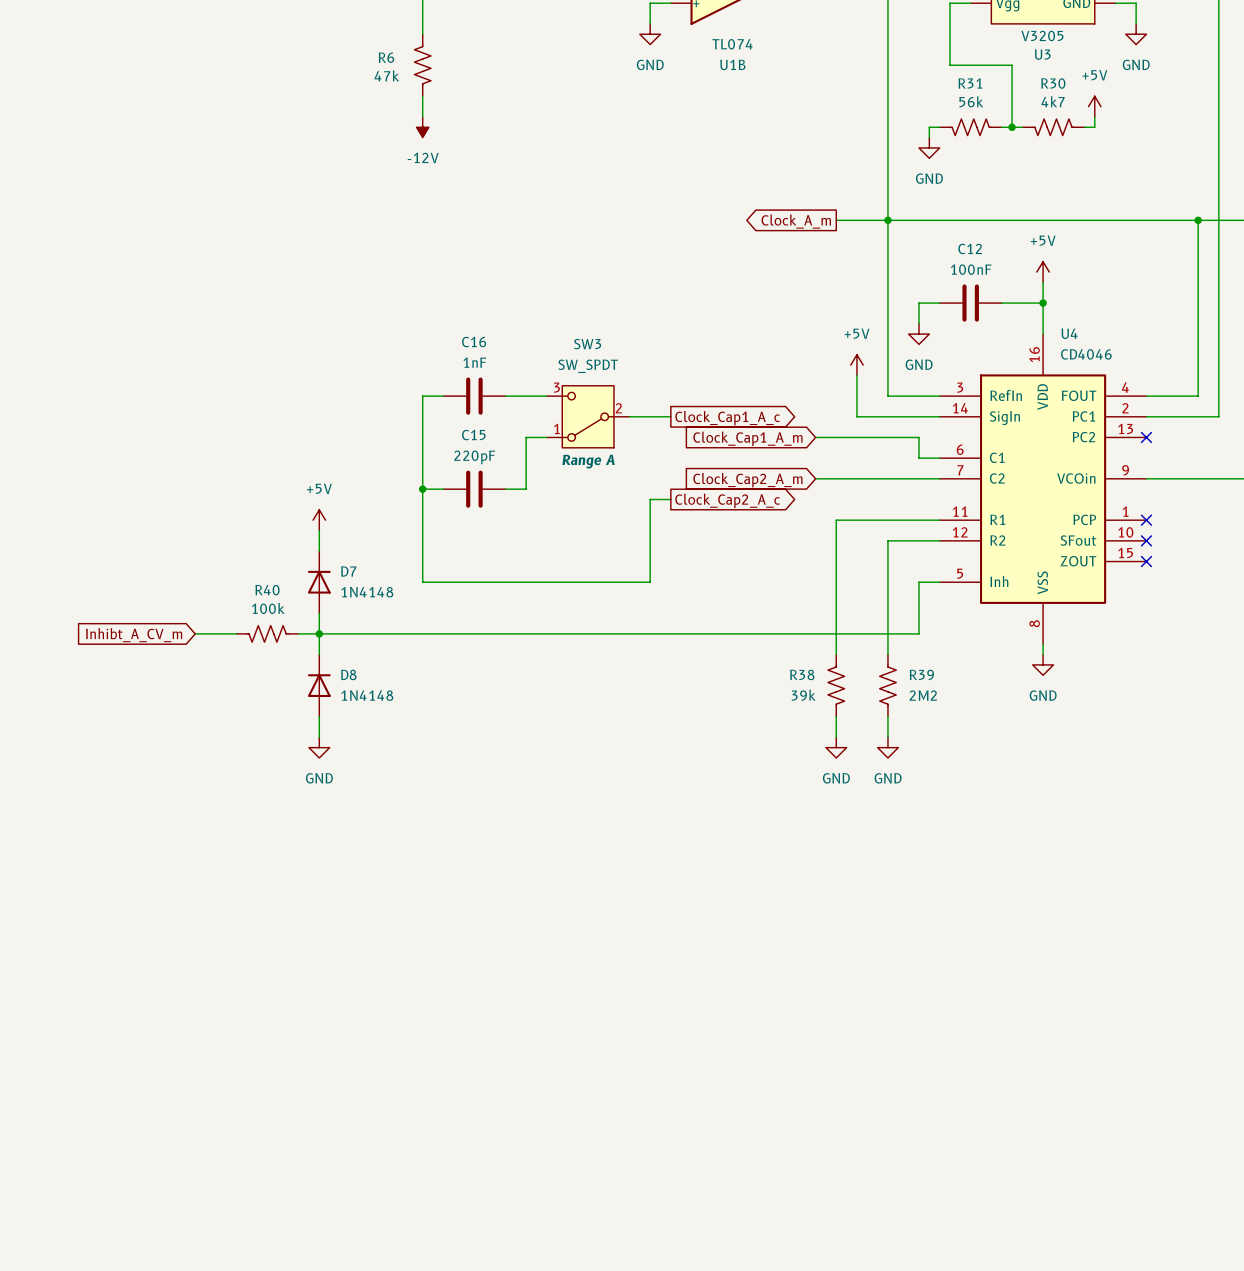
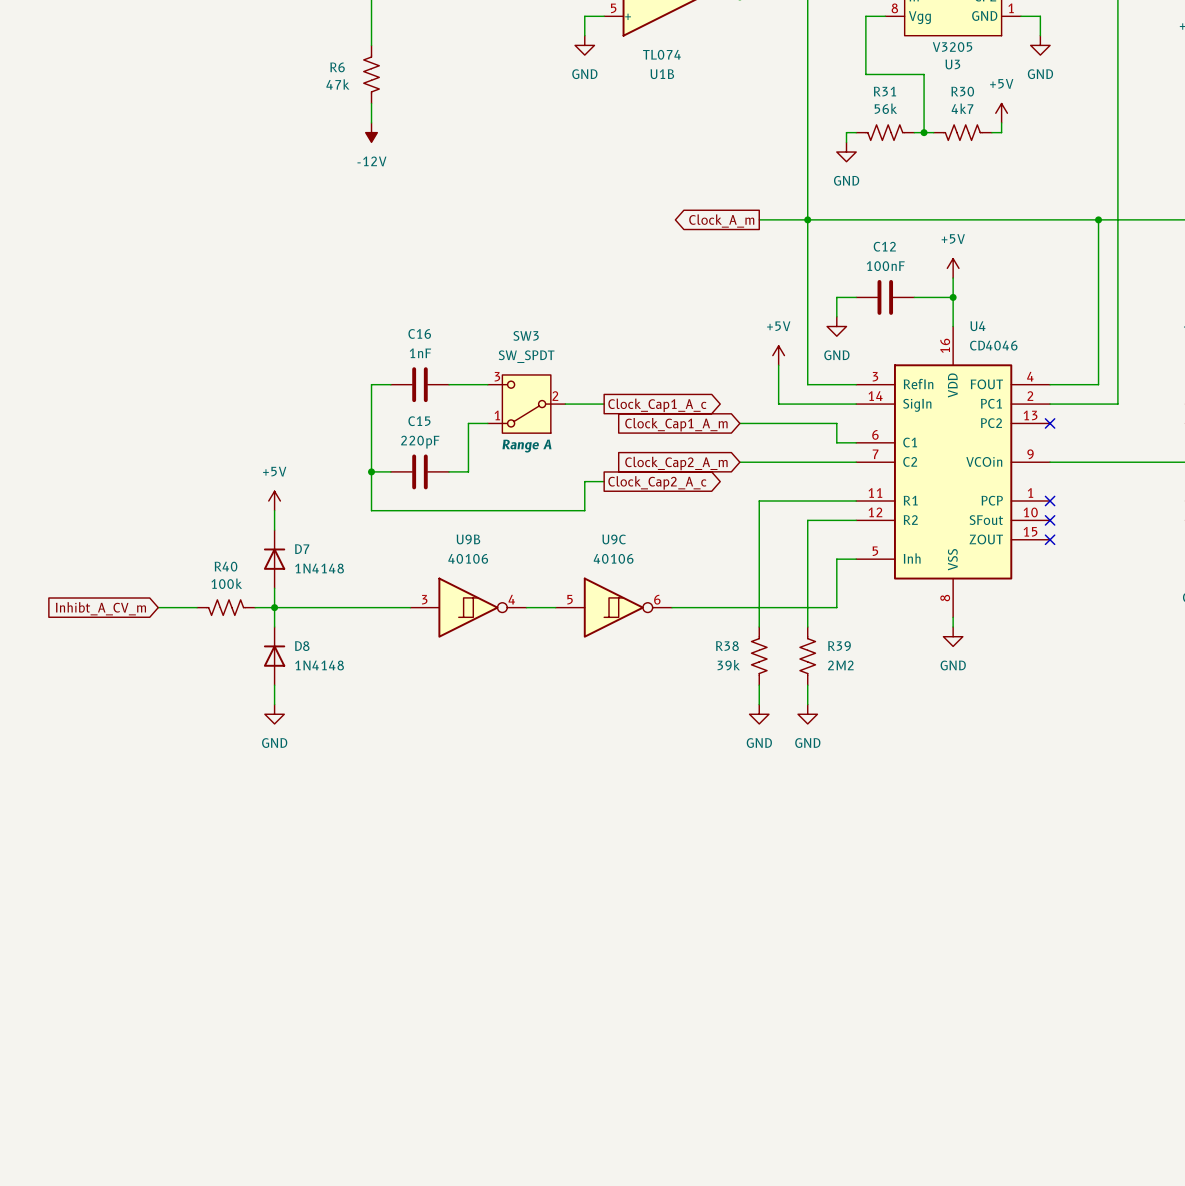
wire: (422, 530) (422, 582) (650, 582) (650, 530) -> (371, 510) (584, 510)
U9B: none -> 40106 (468, 607)
U9C: none -> 40106 (613, 607)

